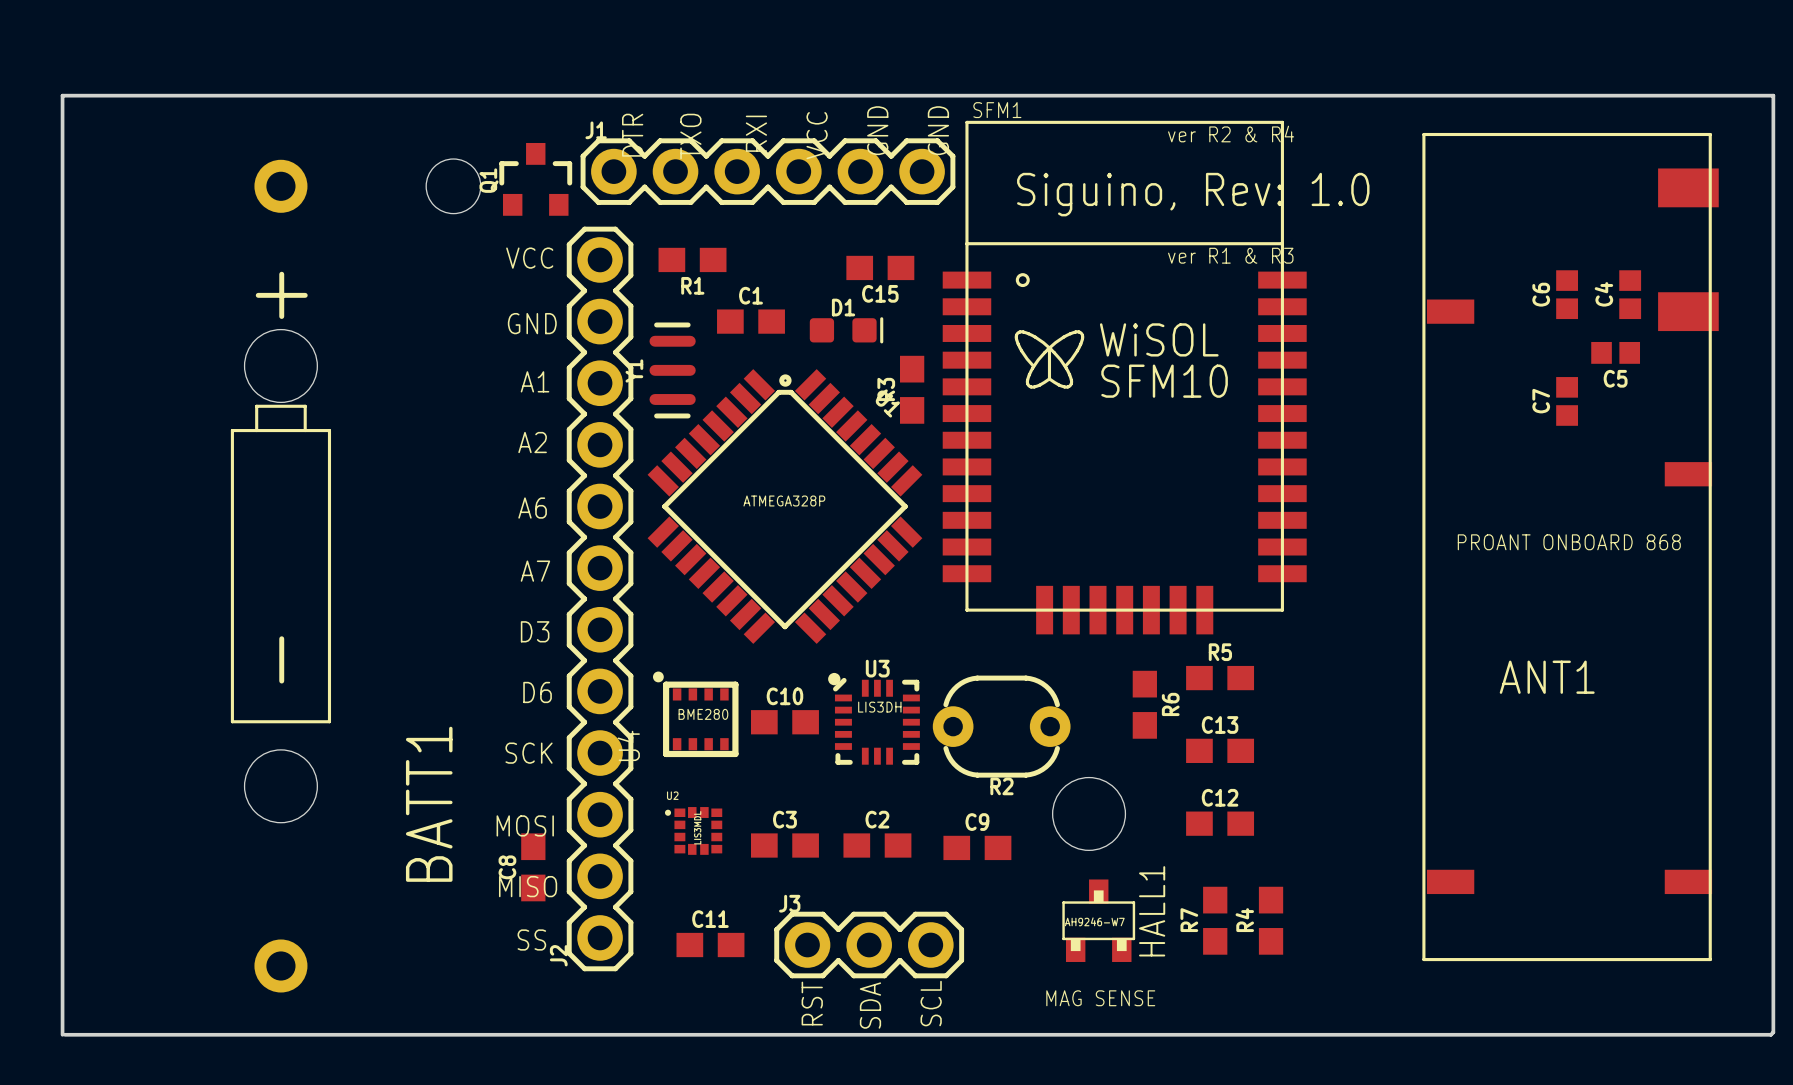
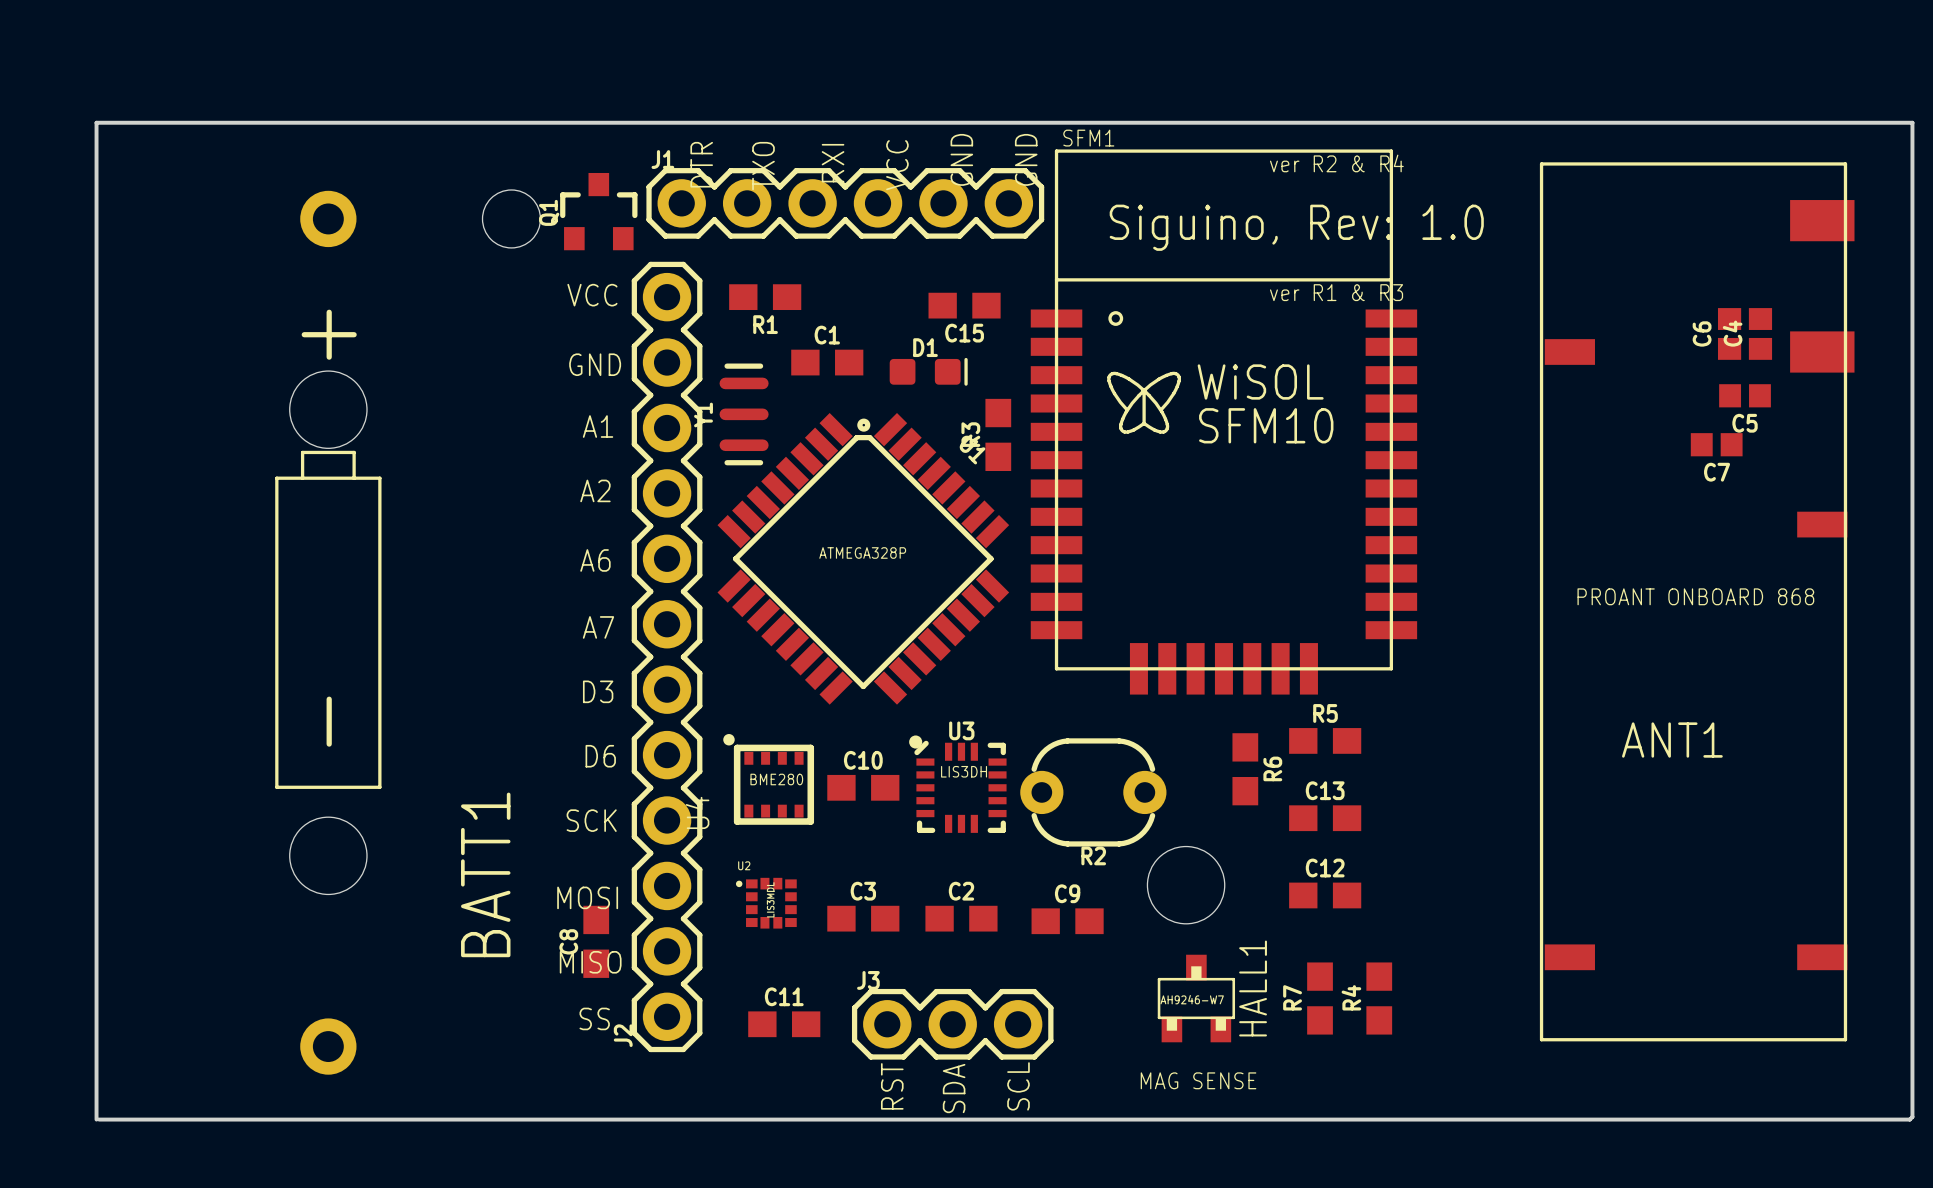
C6 position: (1567, 294) -> (1729, 333)
C7 rotation: 0° (1567, 401) -> 90° clockwise (1716, 444)

